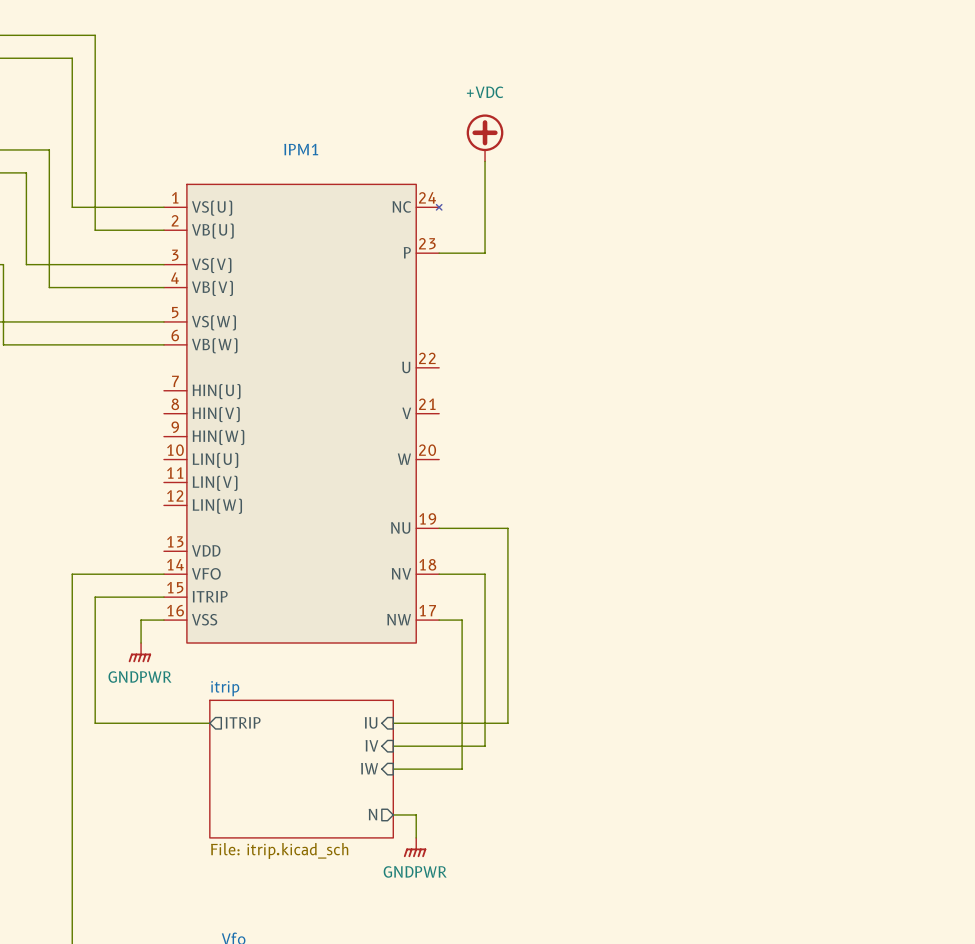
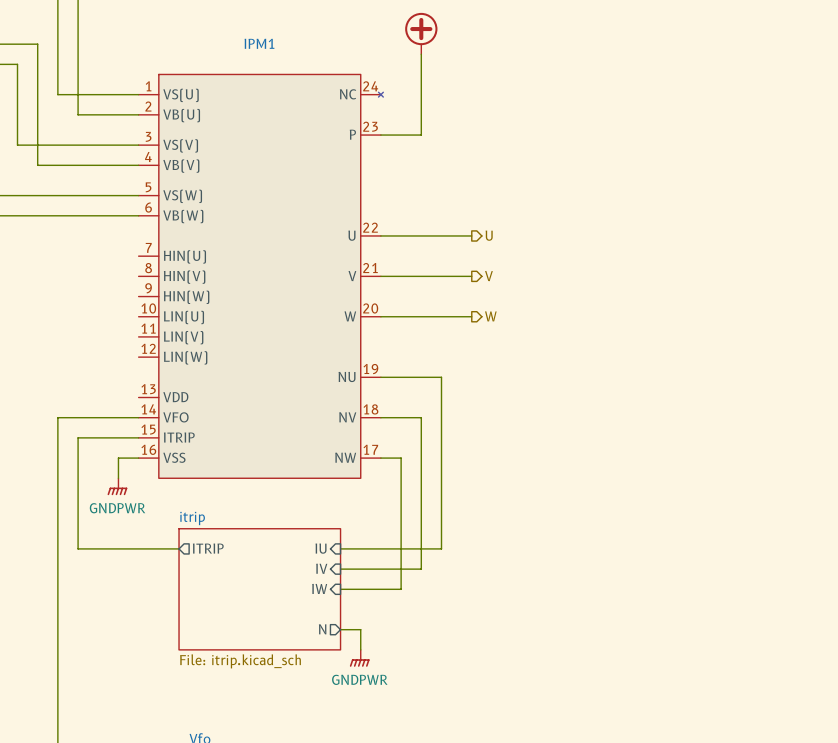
wire: none -> (380, 235) (471, 235)
hierarchical label: none -> U (489, 235)
wire: none -> (380, 276) (471, 276)
hierarchical label: none -> V (488, 276)
wire: none -> (380, 316) (471, 316)
hierarchical label: none -> W (490, 316)

